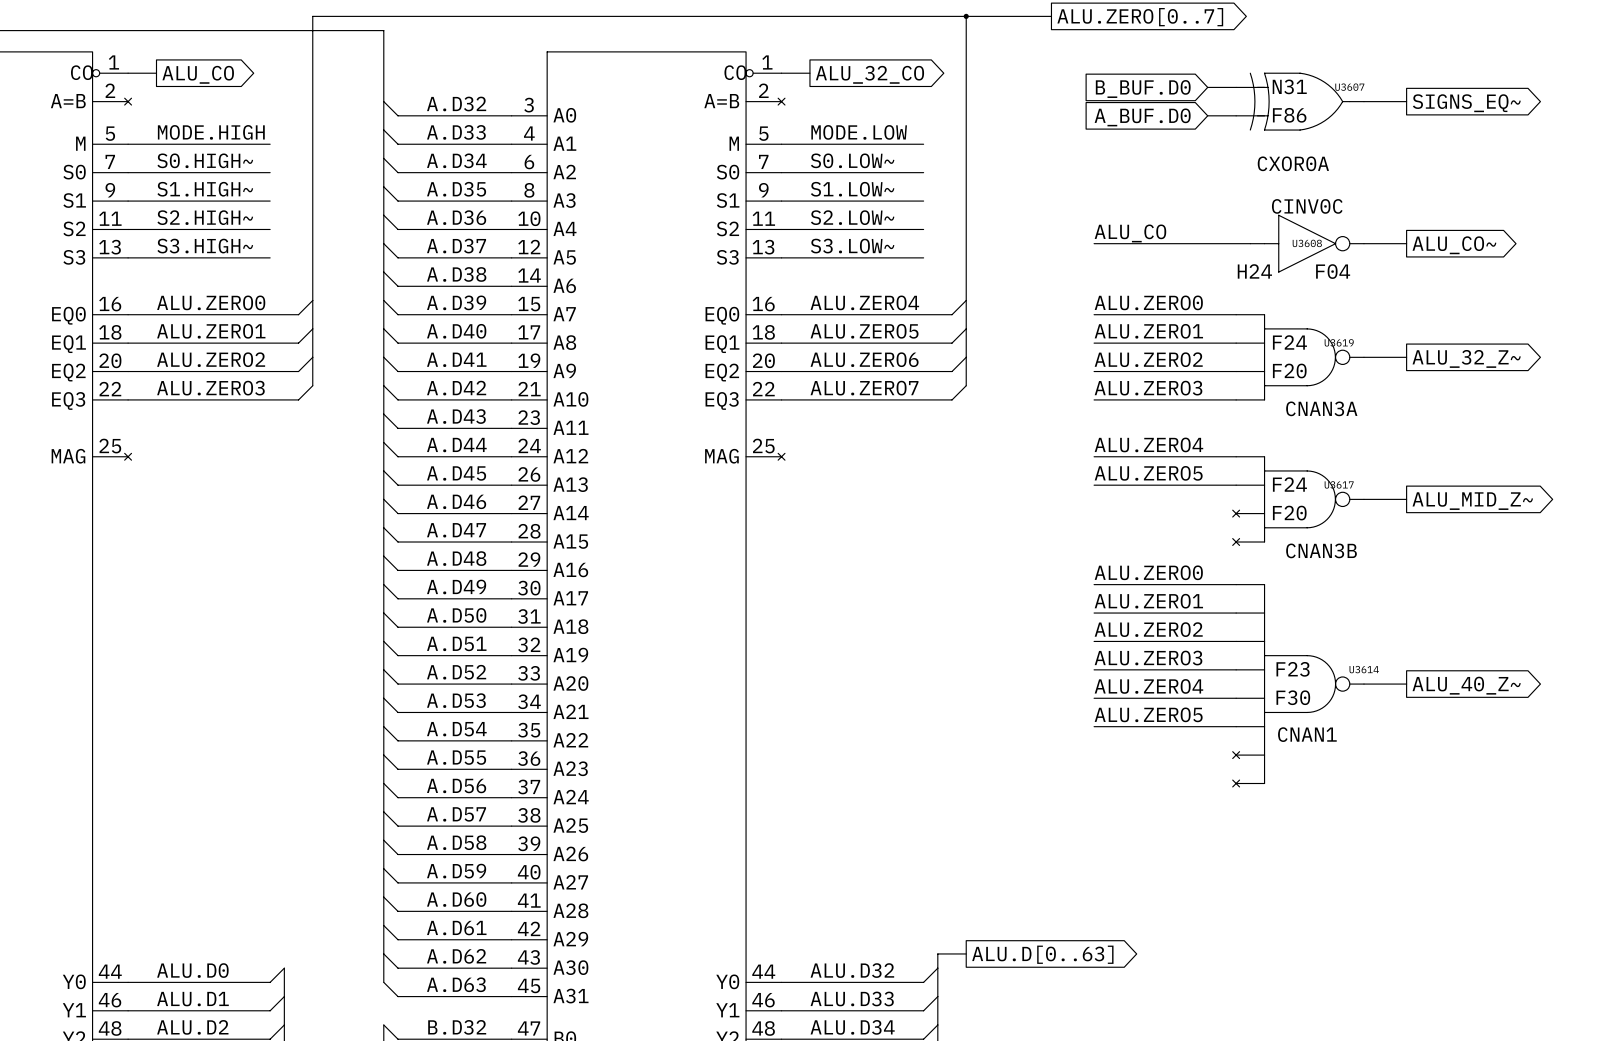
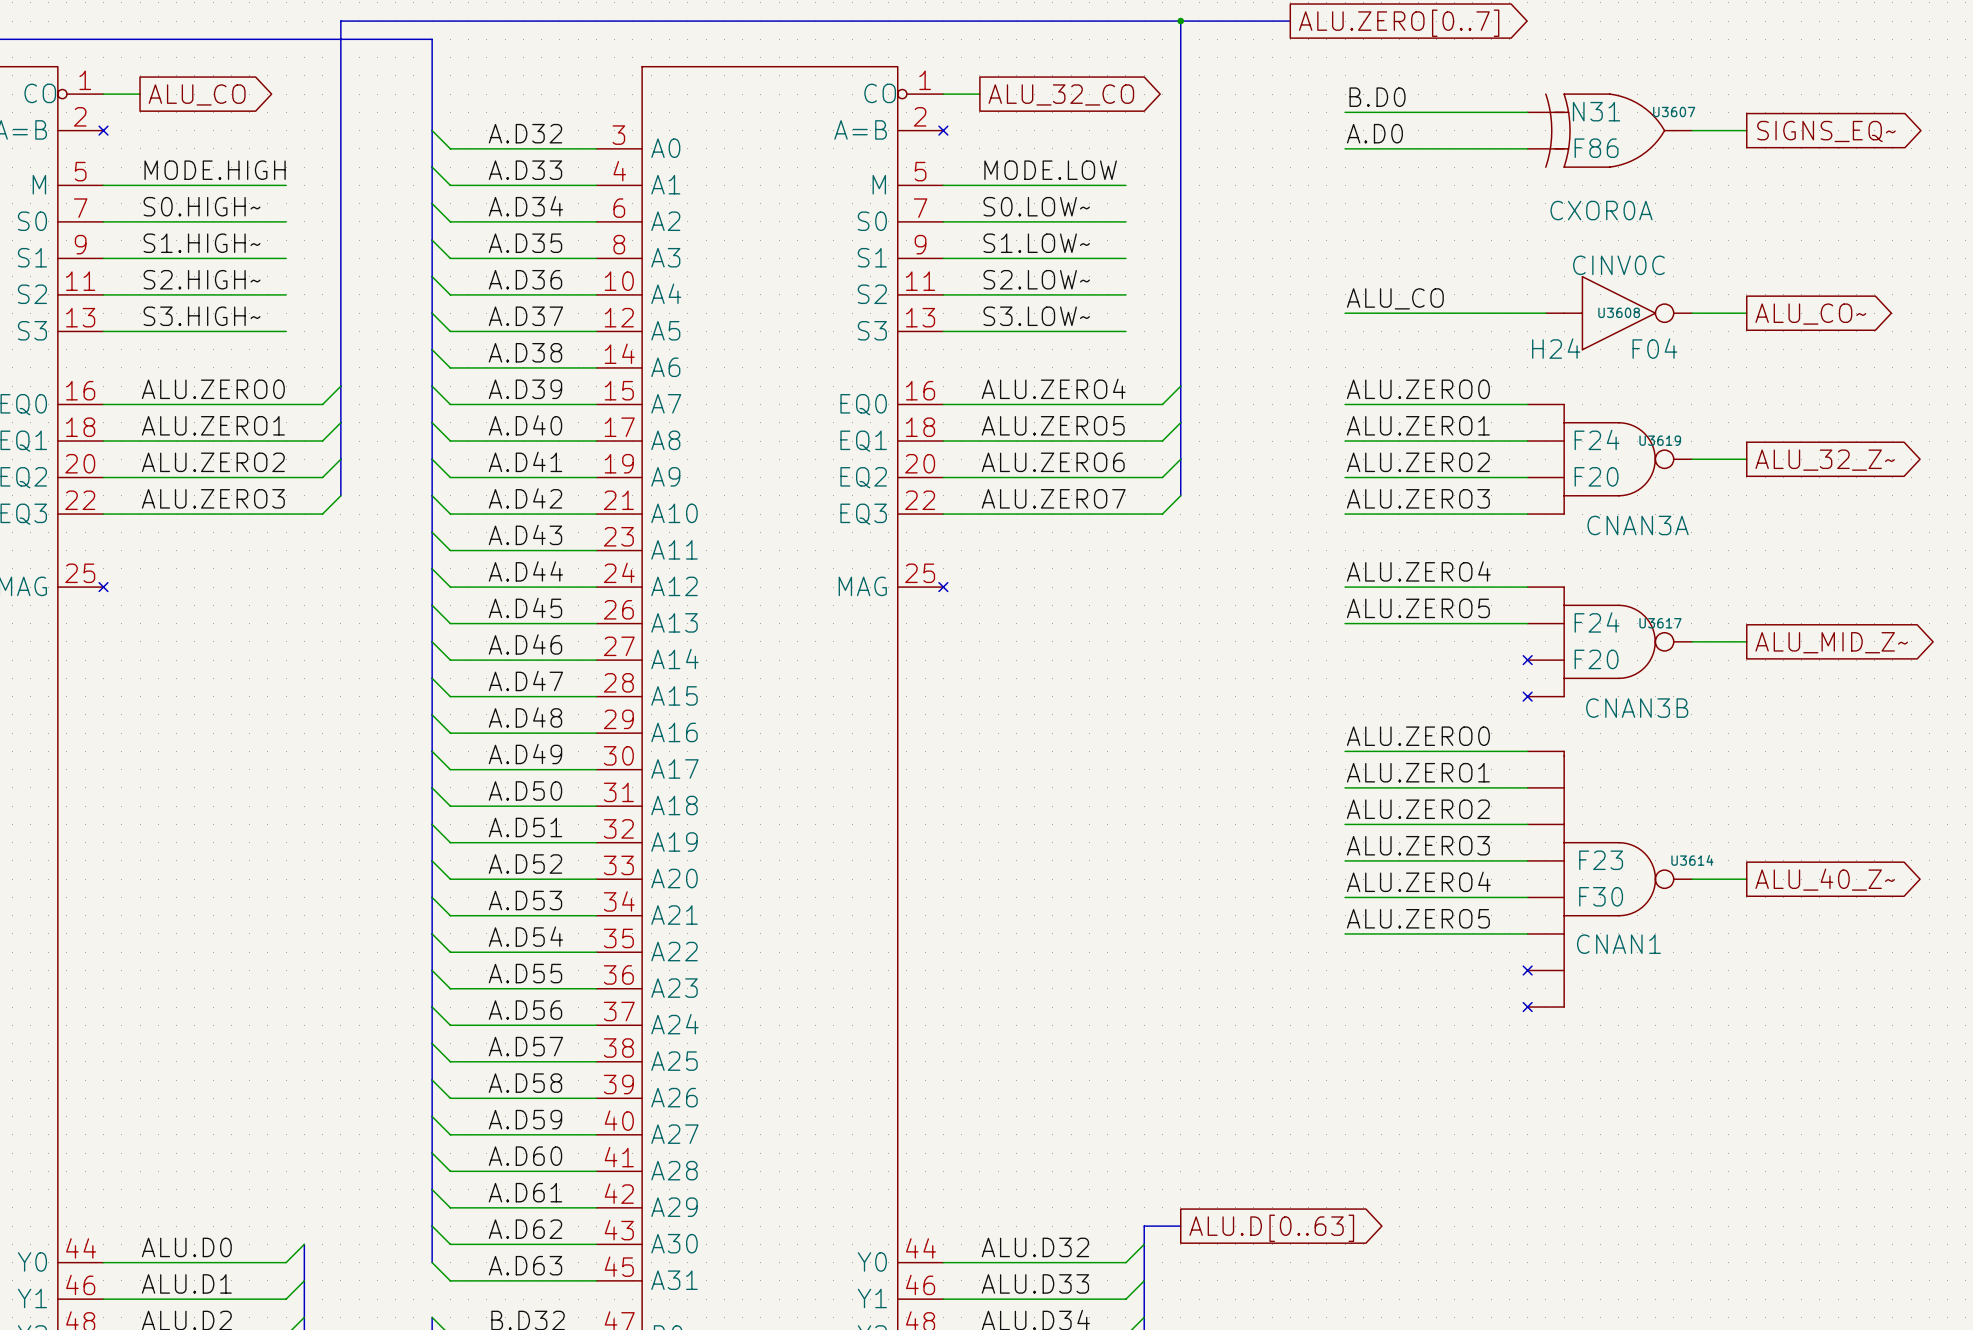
label: none -> B.D0 (1377, 97)
wire: none -> (1345, 112) (1491, 112)
global label: B_BUF.D0 (1143, 89) -> none
label: none -> A.D0 (1374, 133)
wire: none -> (1345, 148) (1491, 148)
global label: A_BUF.D0 (1142, 117) -> none

